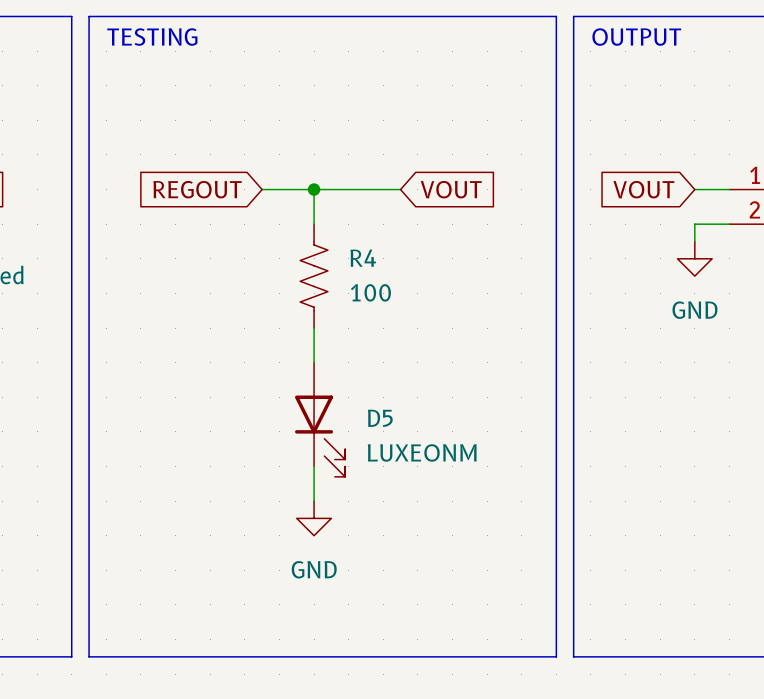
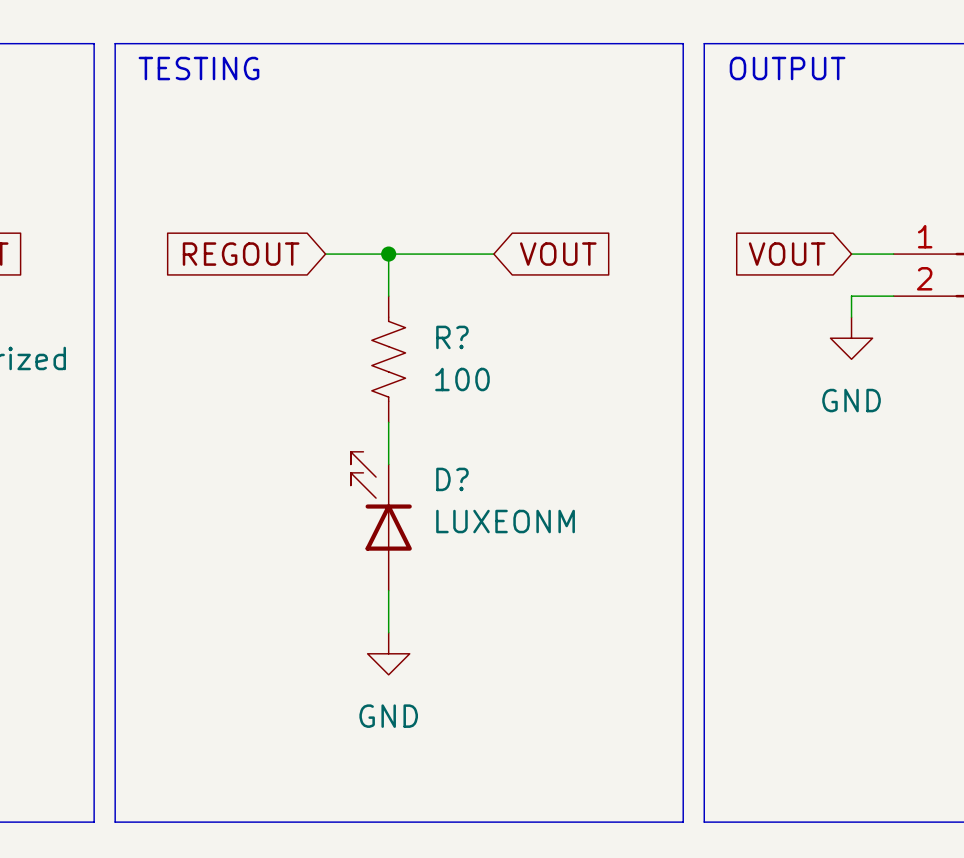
R4 name: R4 (363, 258) -> R? (452, 337)
D?: none -> LUXEONM (381, 521)
D5: LUXEONM (320, 419) -> none

